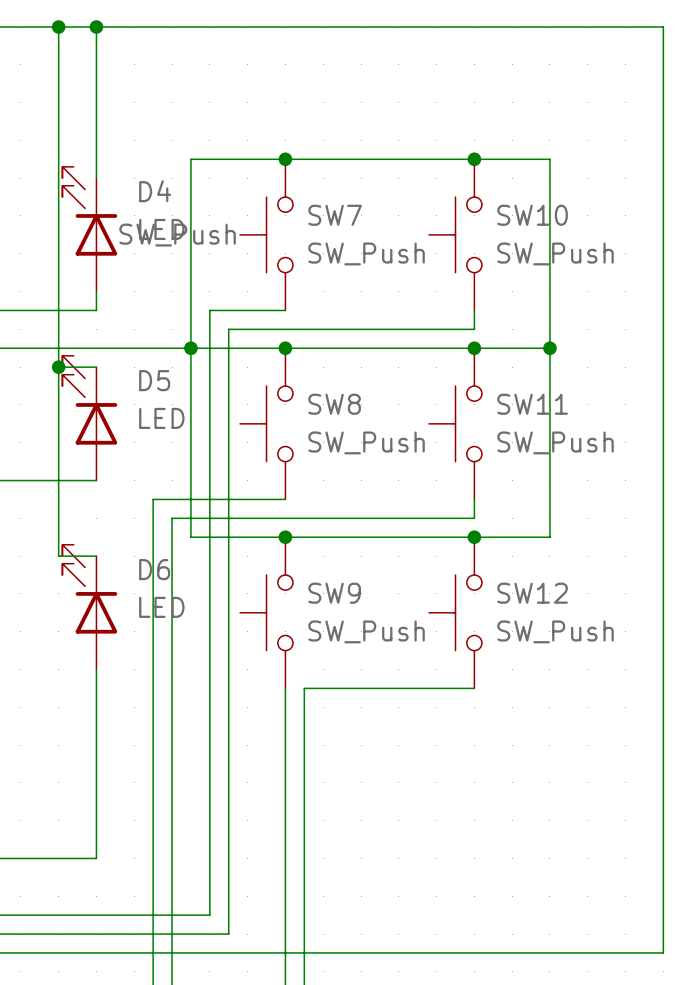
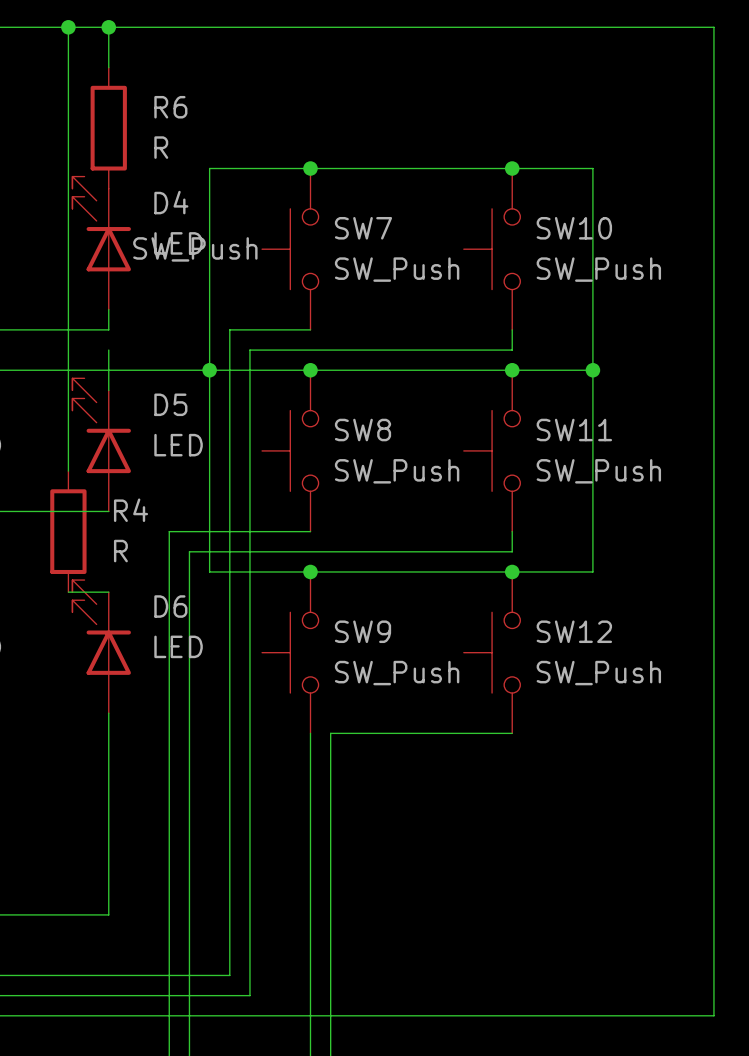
wire: (96, 64) (96, 178) -> none
R6: none -> R (108, 128)
wire: (58, 367) (96, 367) -> (108, 350) (108, 390)
junction: (58, 367) -> none
wire: (58, 442) (58, 556) -> none
R4: none -> R (68, 531)

